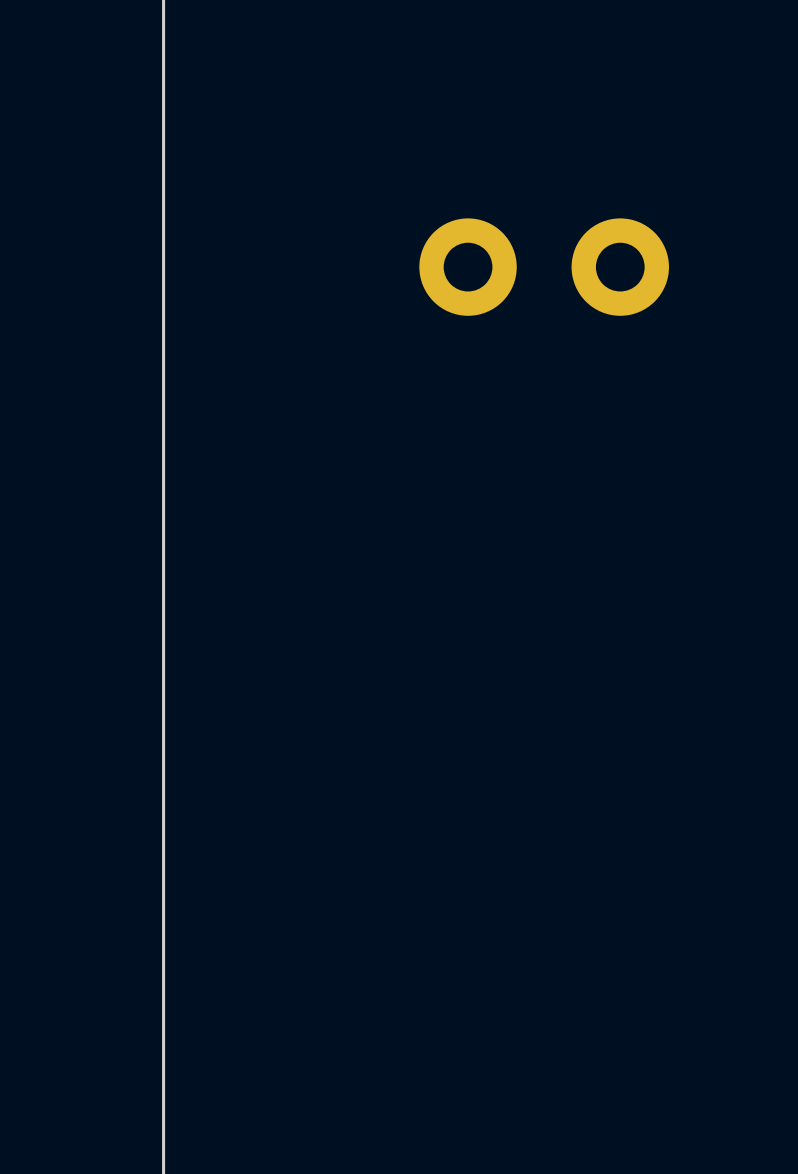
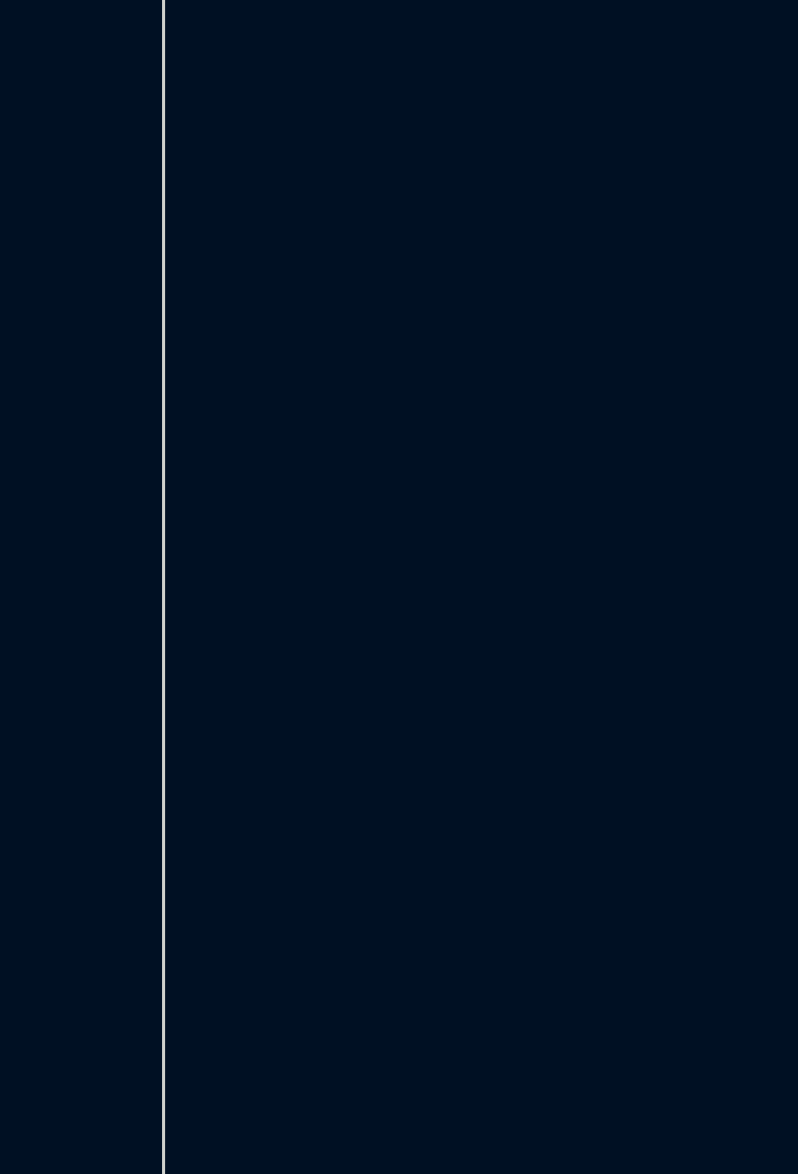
part: (544, 267) -> none

